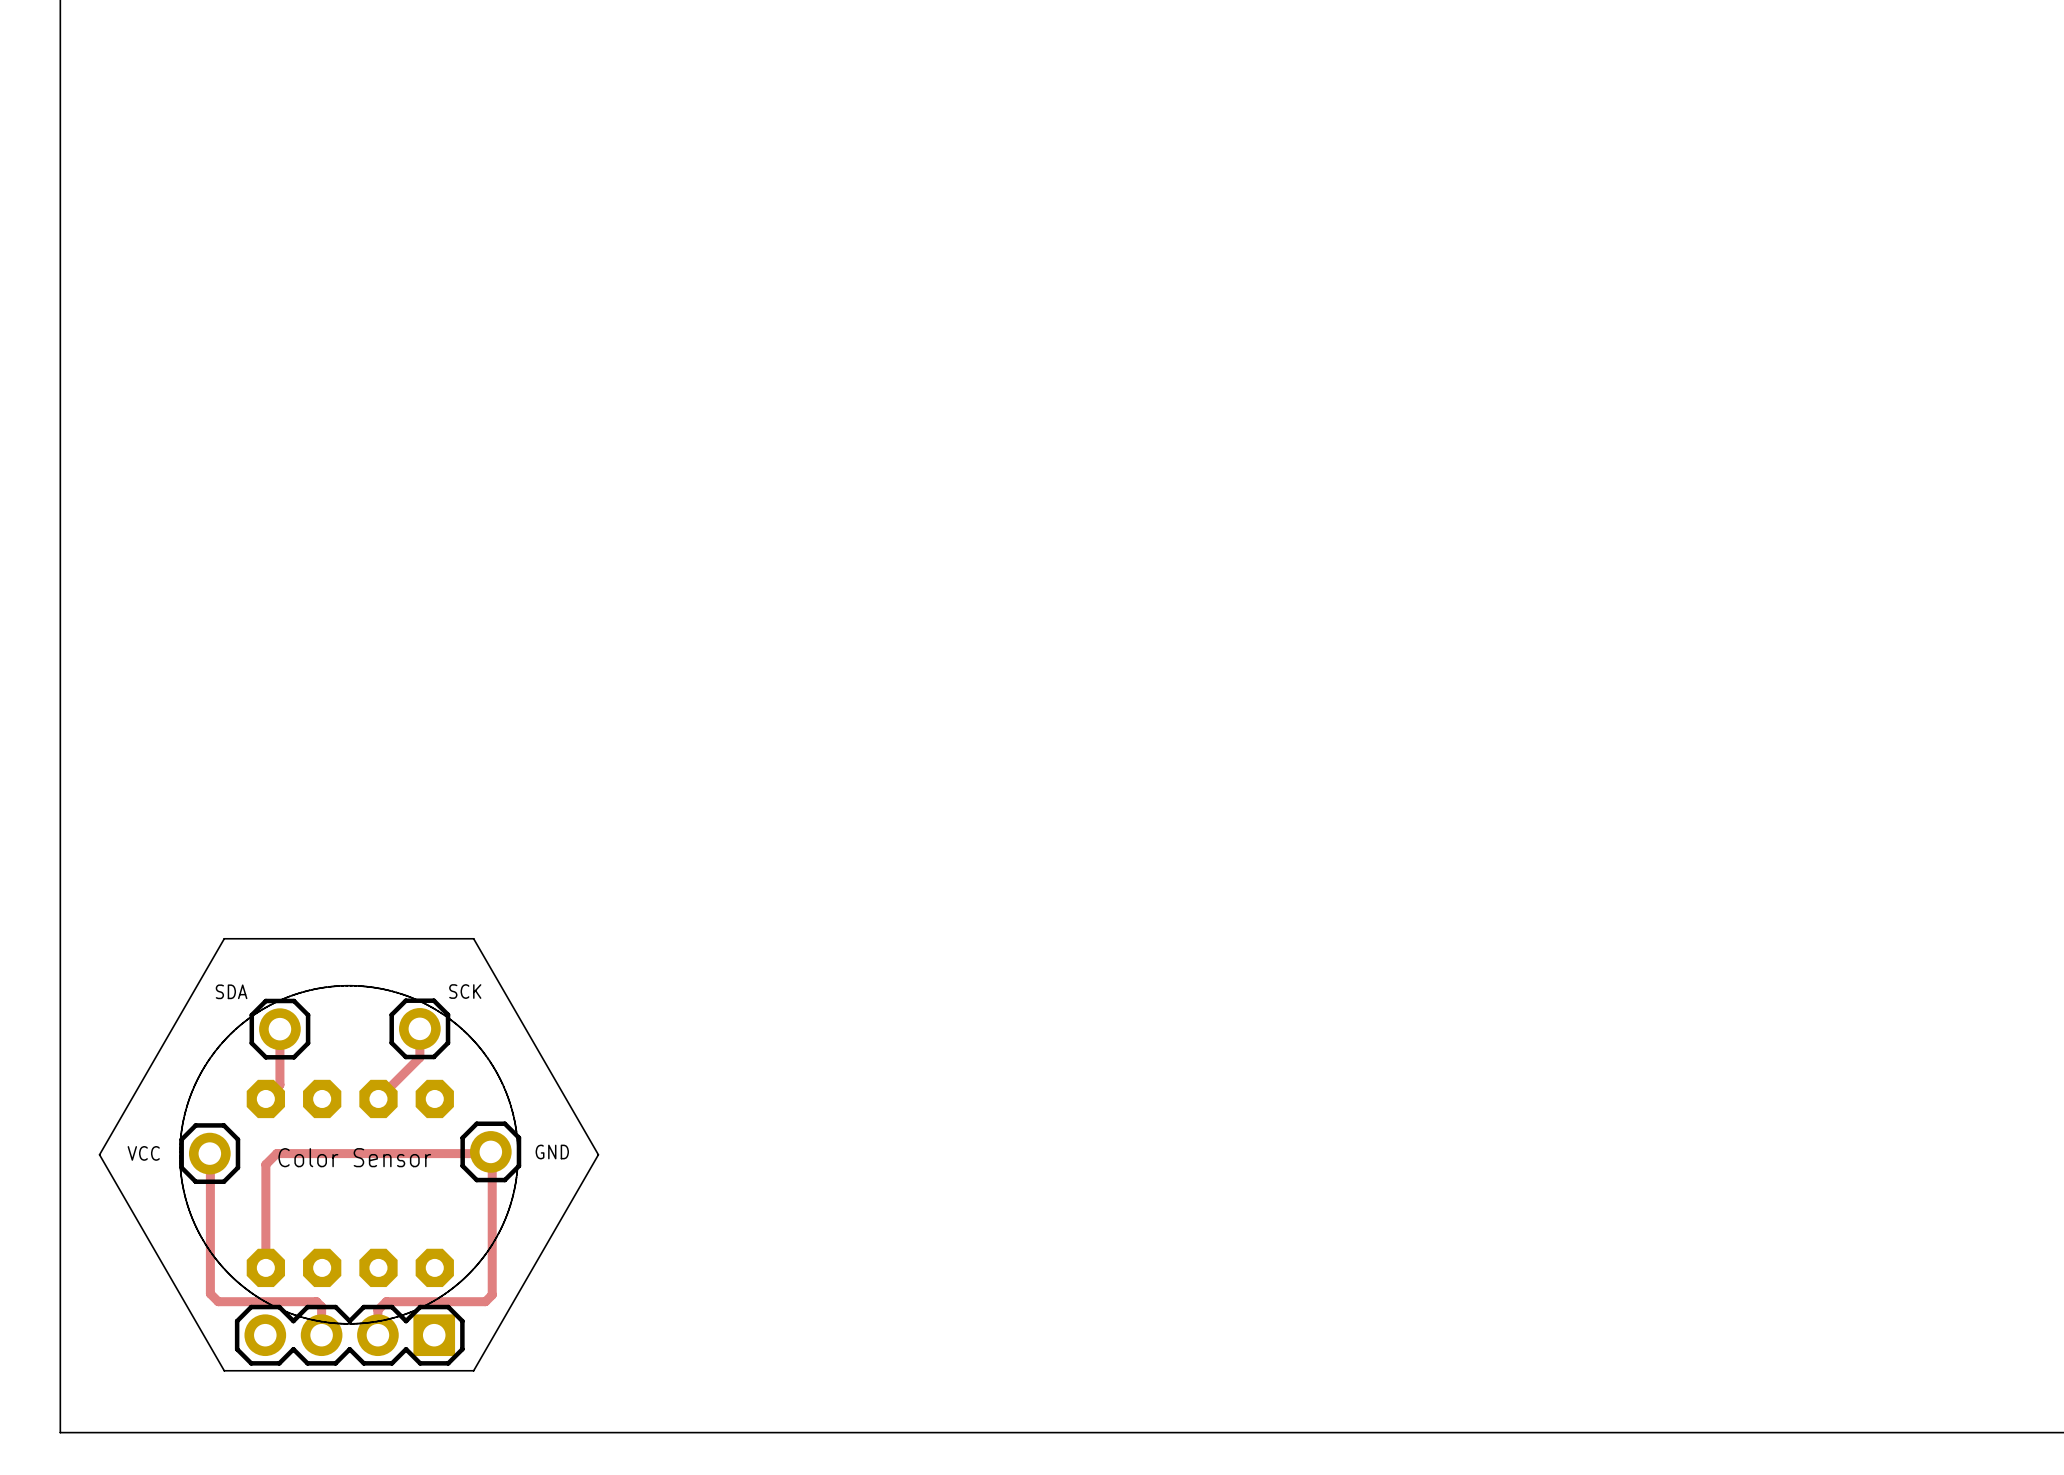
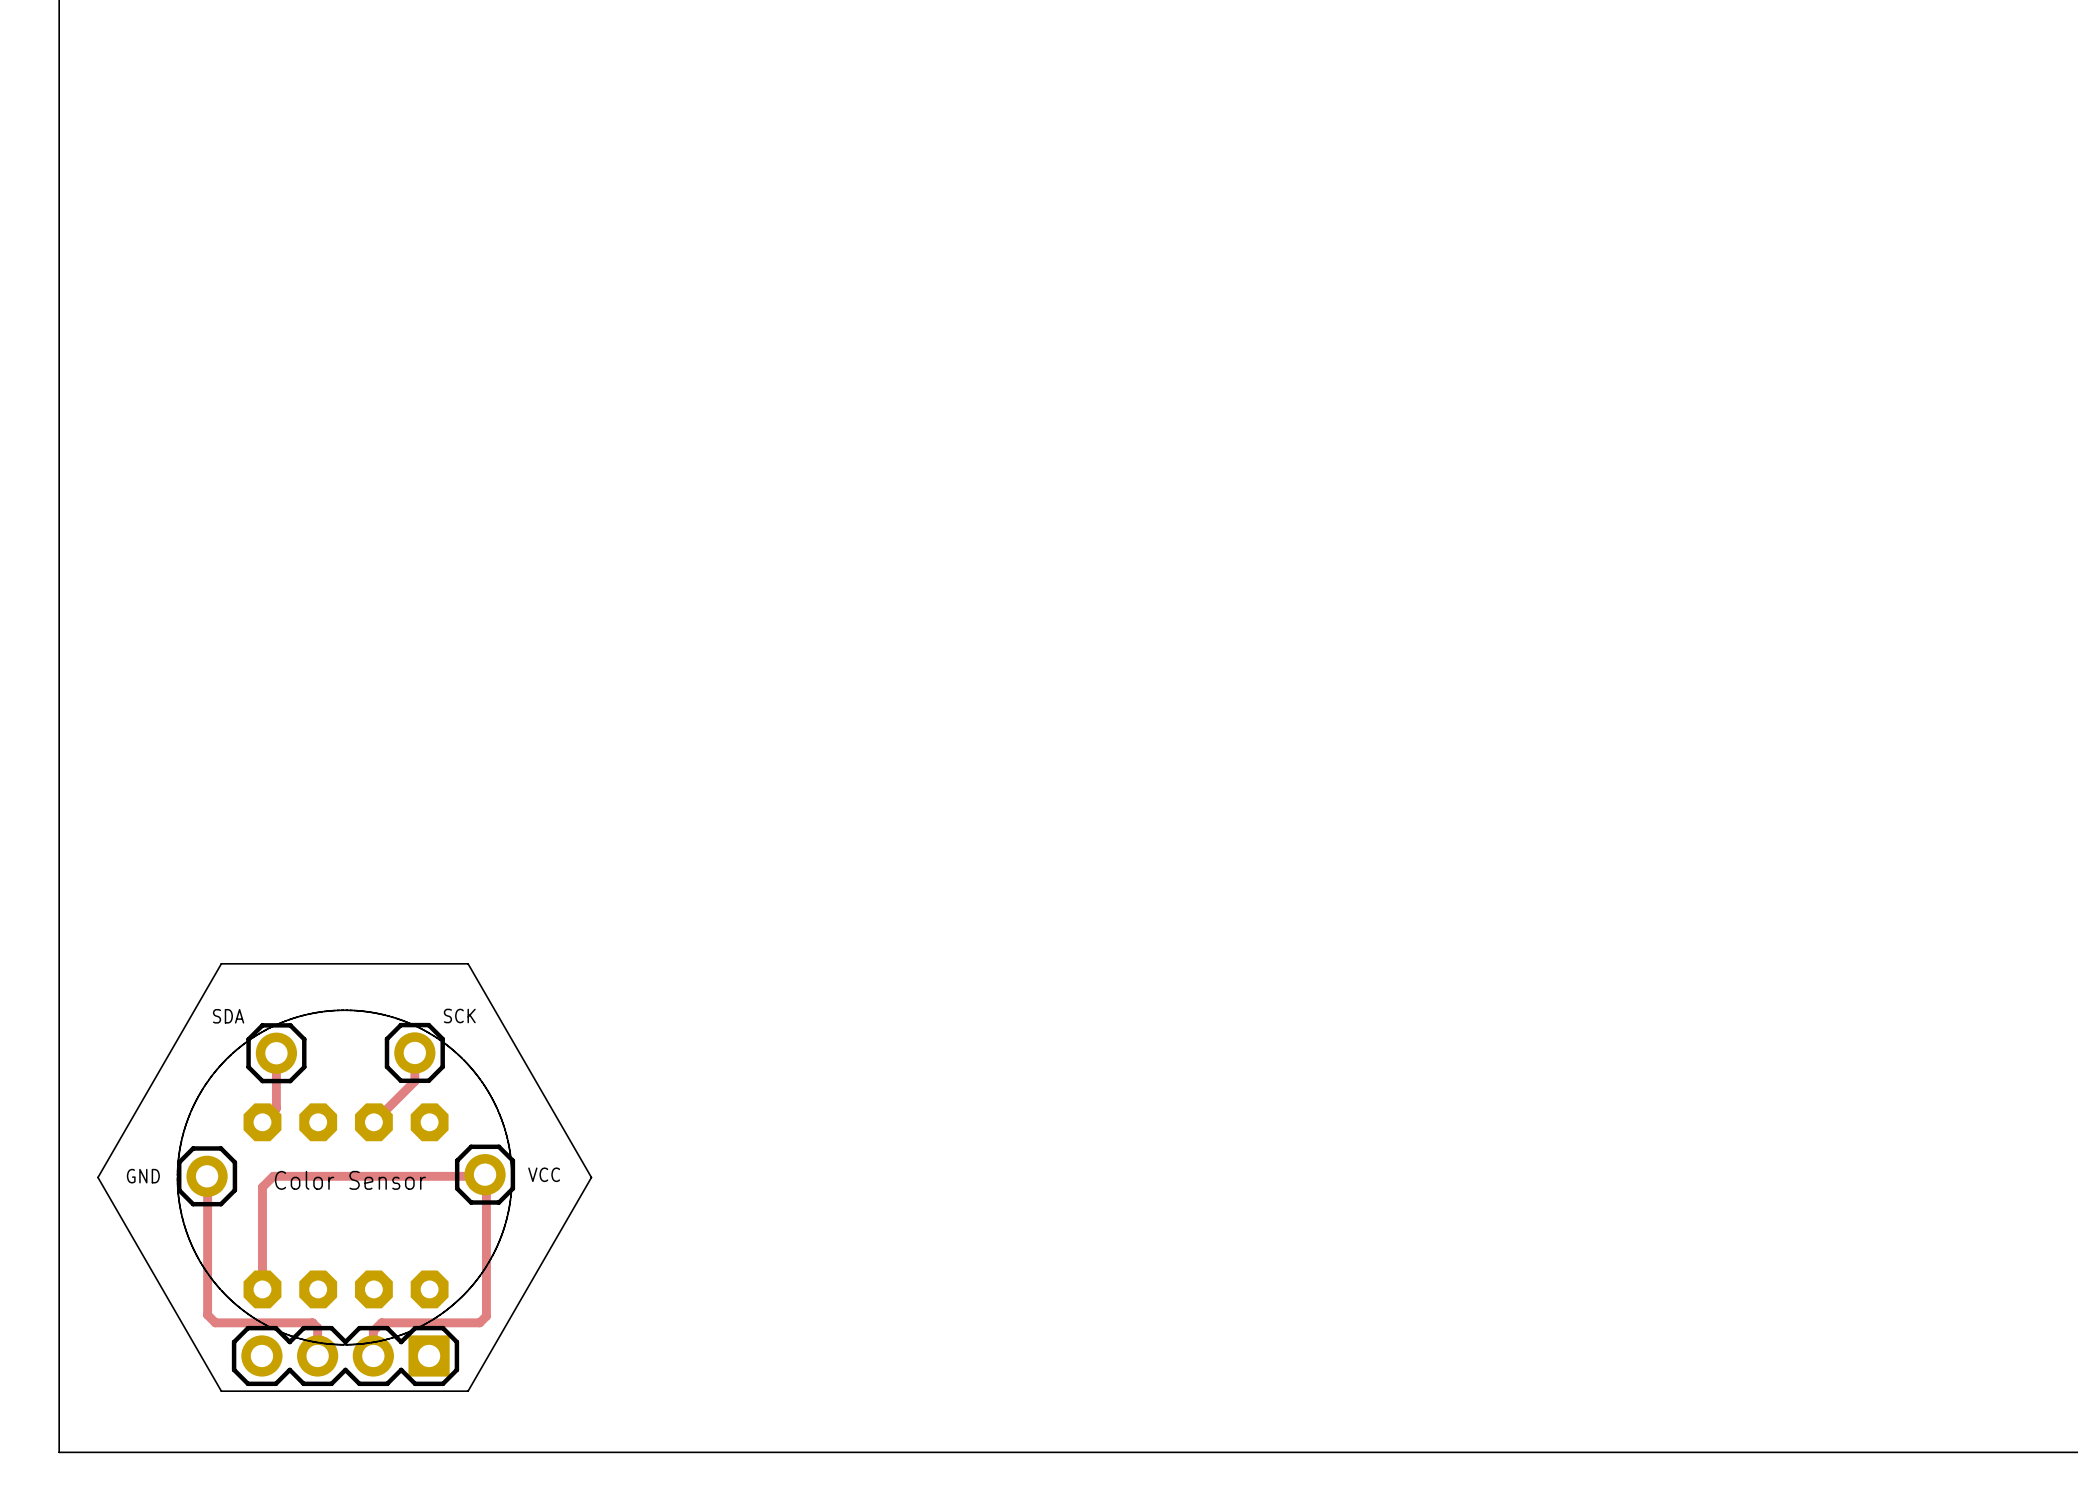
text: GND (552, 1152) -> VCC (544, 1174)
text: VCC (143, 1153) -> GND (143, 1176)

